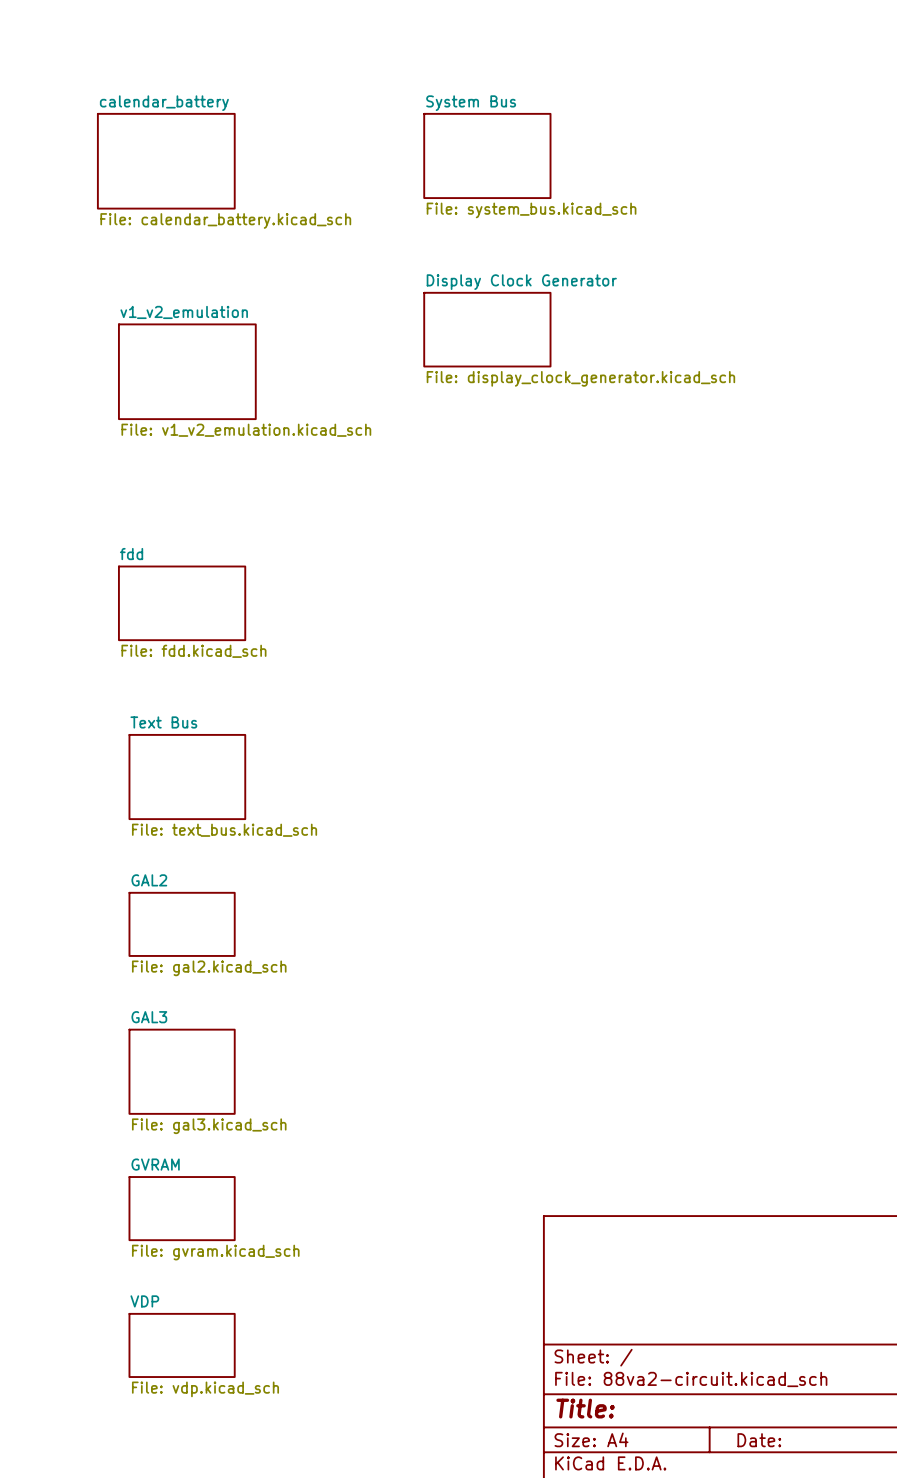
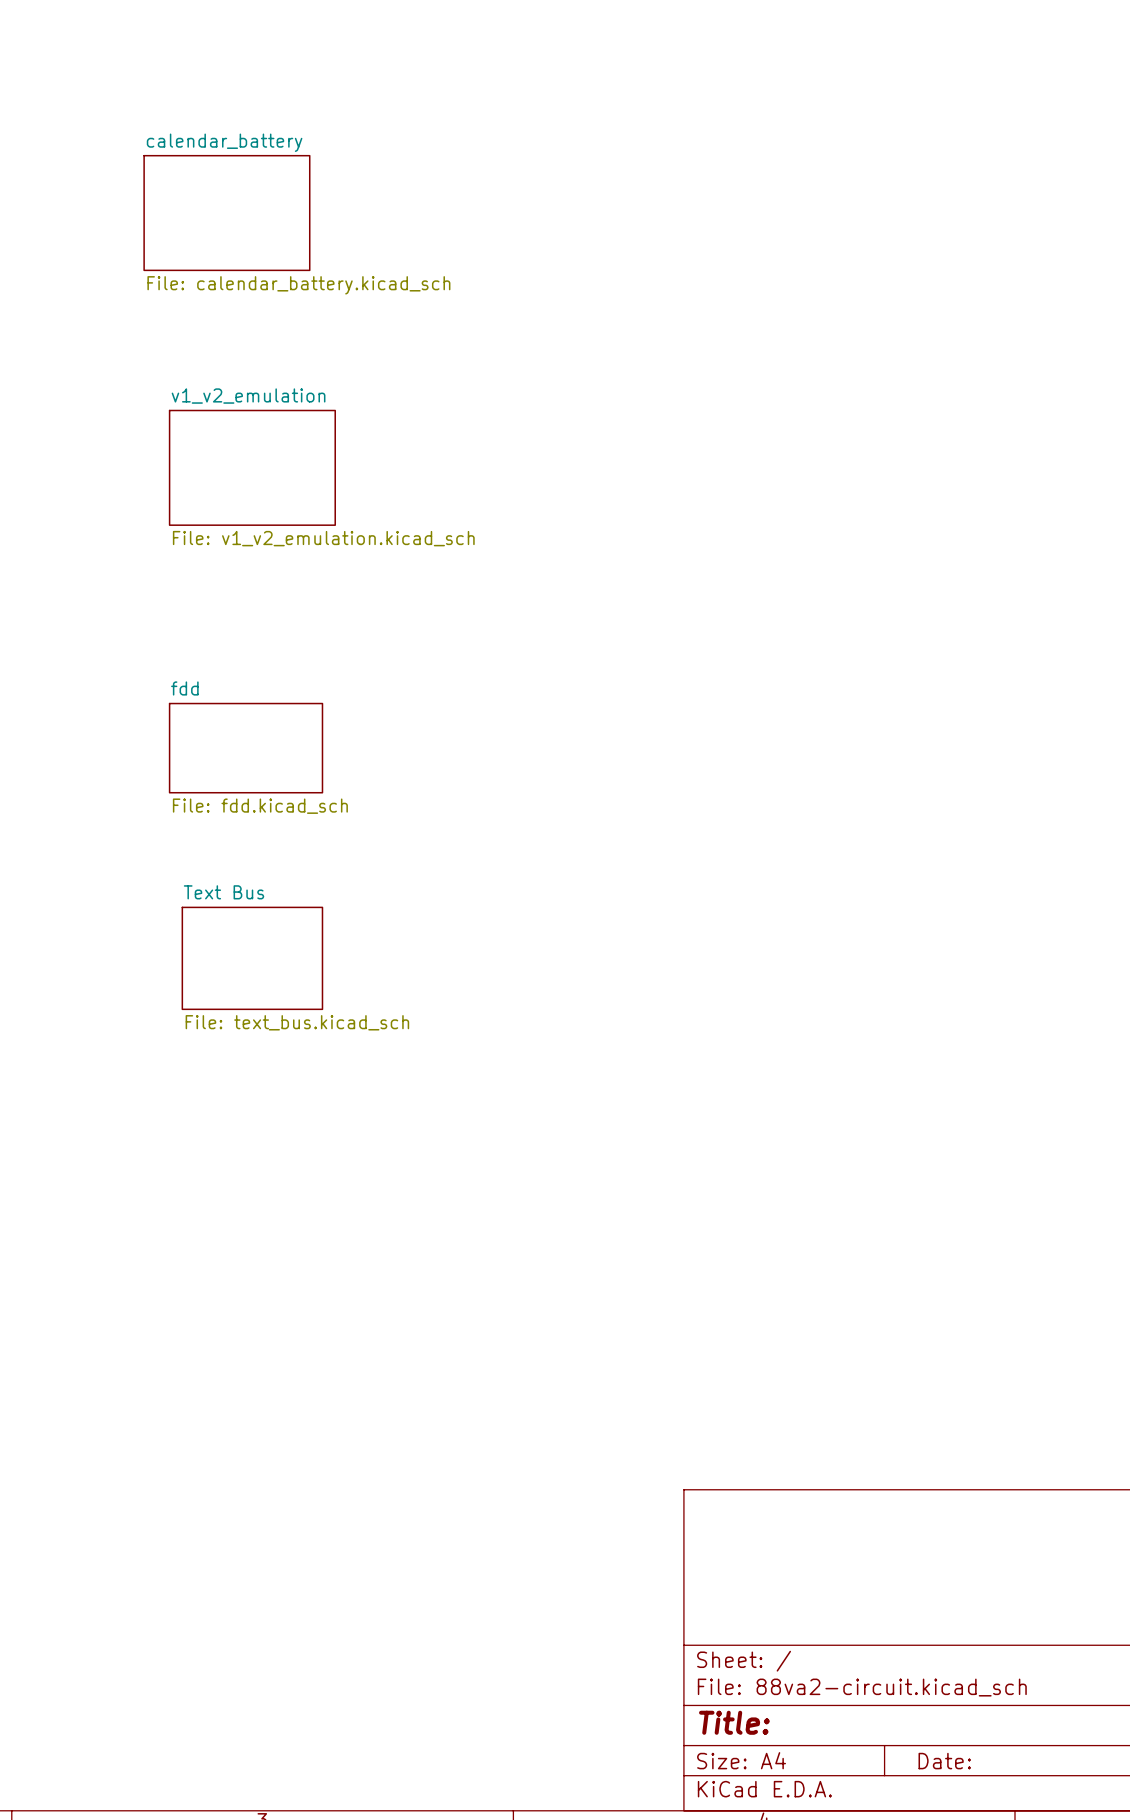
sheet System Bus: File: system_bus.kicad_sch (487, 155) -> none
sheet Display Clock Generator: File: display_clock_generator.kicad_sch (487, 329) -> none
sheet GAL2: File: gal2.kicad_sch (182, 924) -> none
sheet GAL3: File: gal3.kicad_sch (182, 1071) -> none
sheet GVRAM: File: gvram.kicad_sch (182, 1208) -> none
sheet VDP: File: vdp.kicad_sch (182, 1345) -> none

